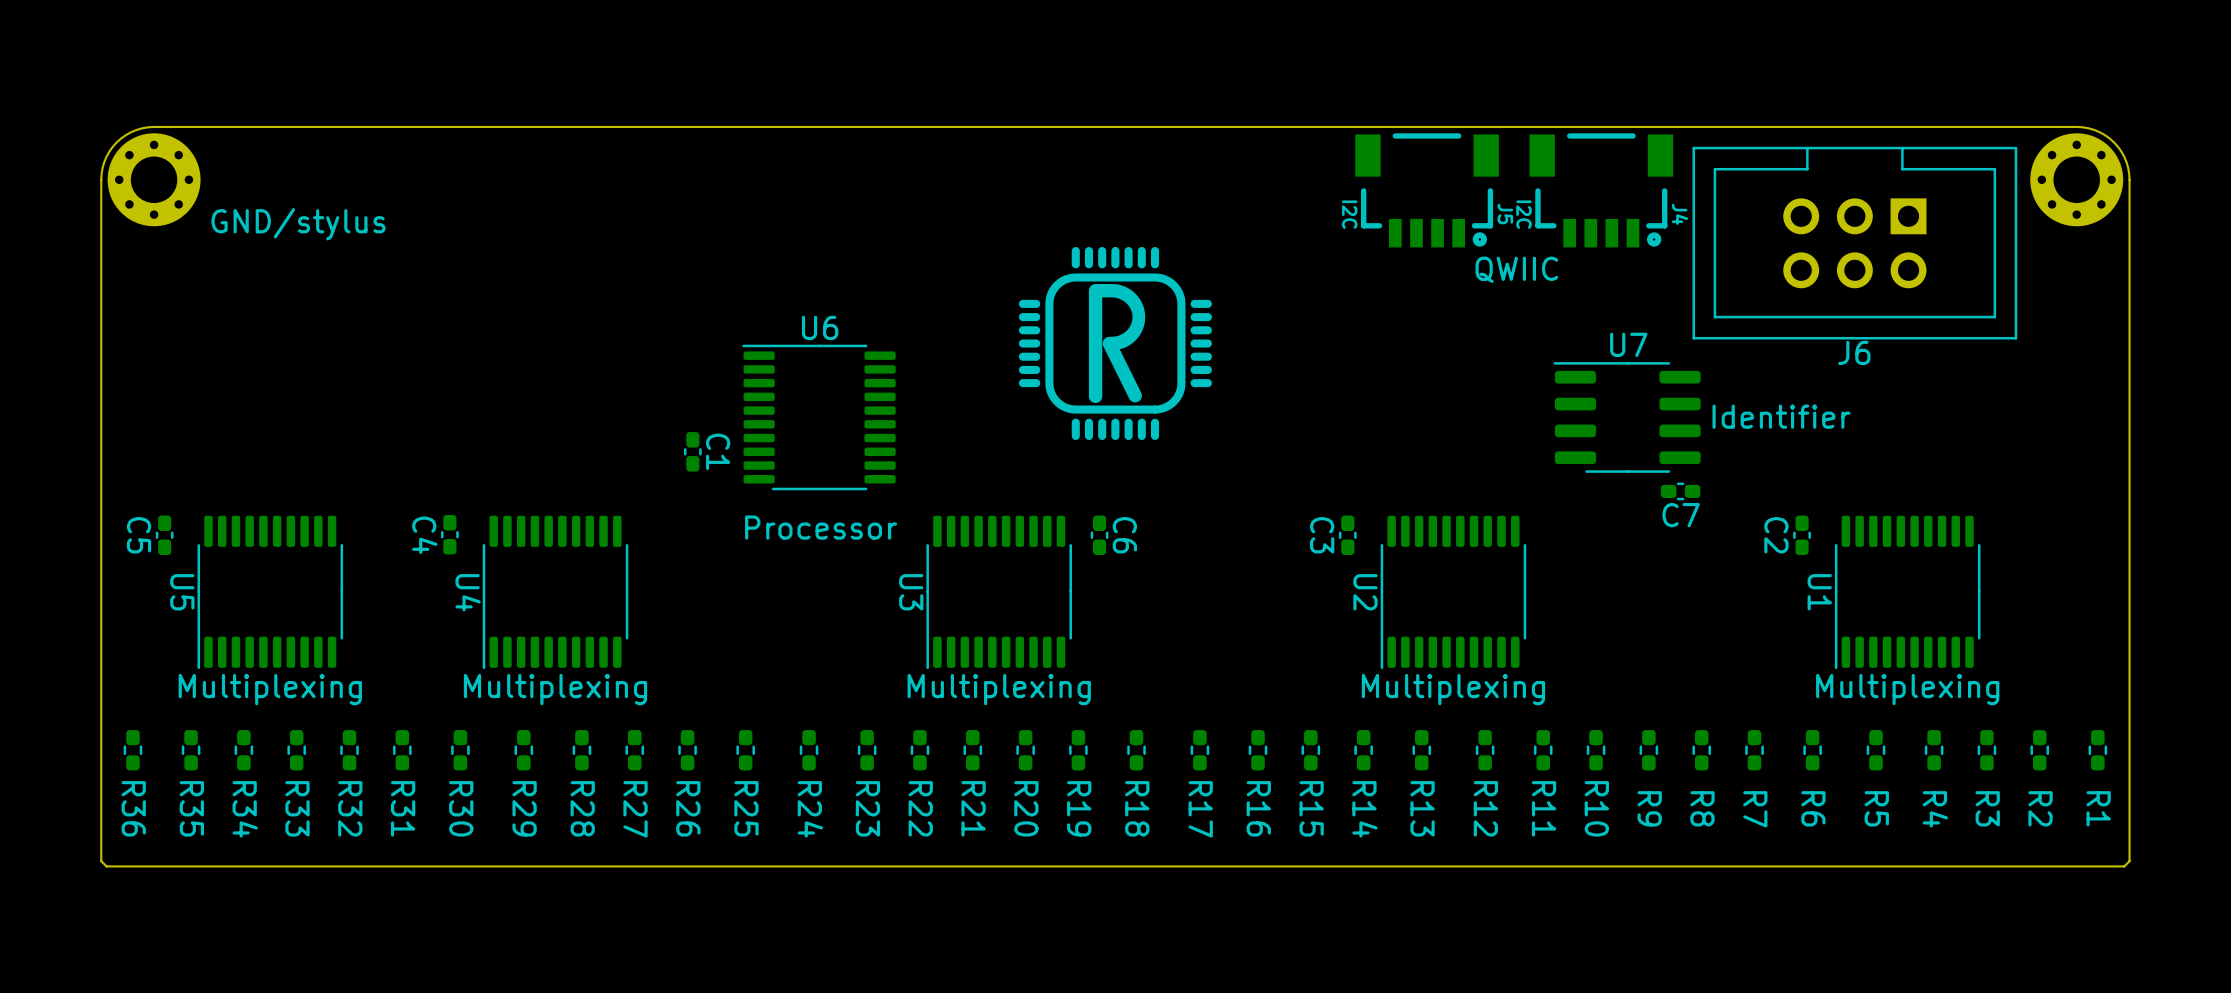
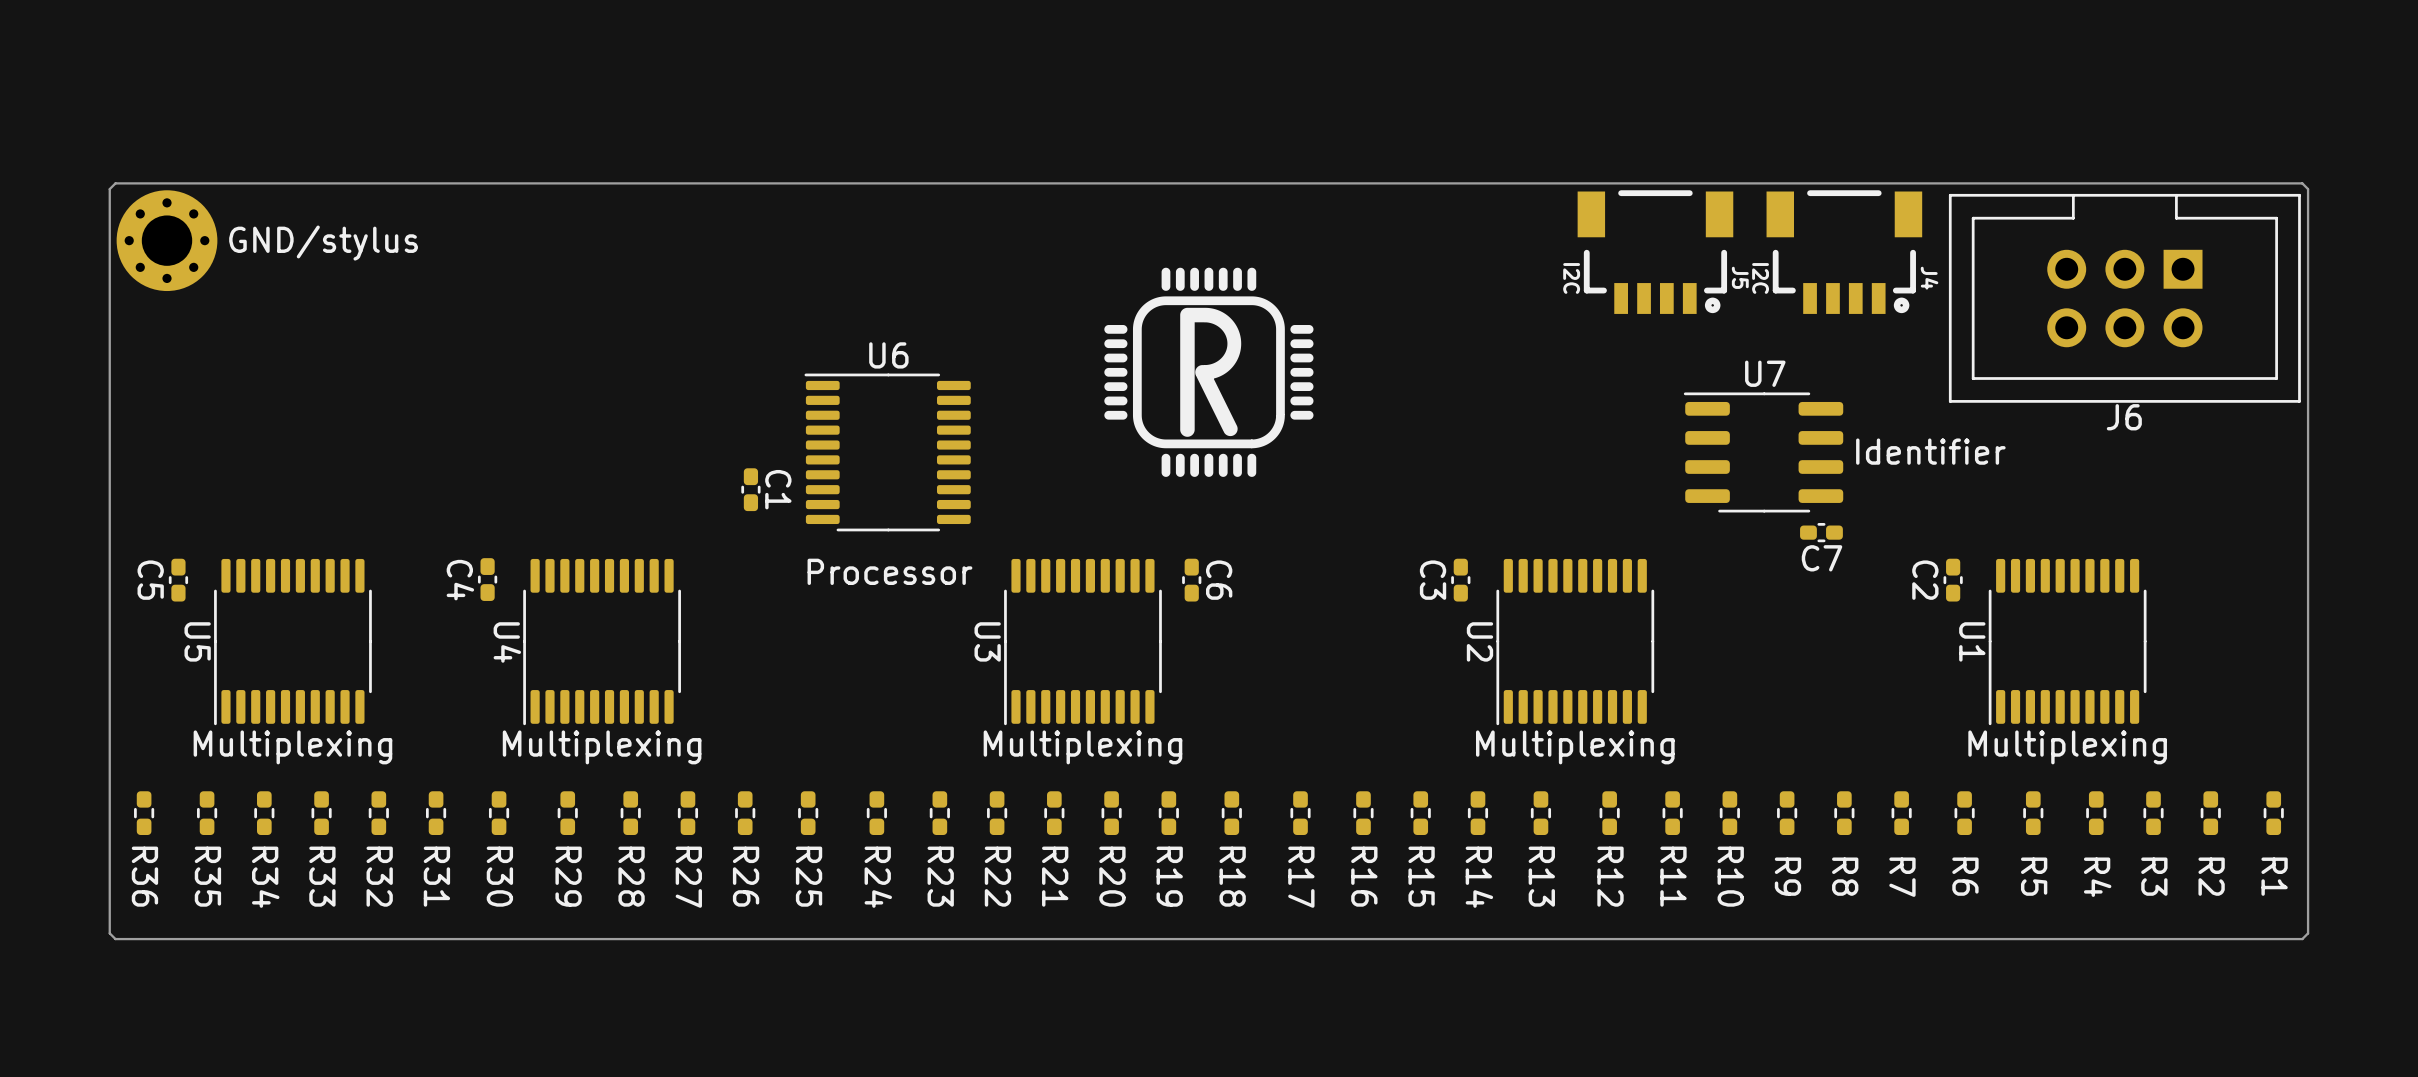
part position: (154, 179) -> (167, 240)
part: (2076, 179) -> none
board edge: (2129, 179) (2124, 156) (2114, 142) (2094, 129) (2076, 126) (154, 126) (131, 132) (116, 142) (106, 156) (101, 179) -> (2308, 194) (2308, 189) (2302, 183) (115, 183) (109, 189) (109, 194)
J5 position: (1427, 190) -> (1655, 252)
J4 position: (1601, 190) -> (1844, 252)
J6 position: (1854, 243) -> (2124, 298)
text: QWIIC (1516, 269) -> none

